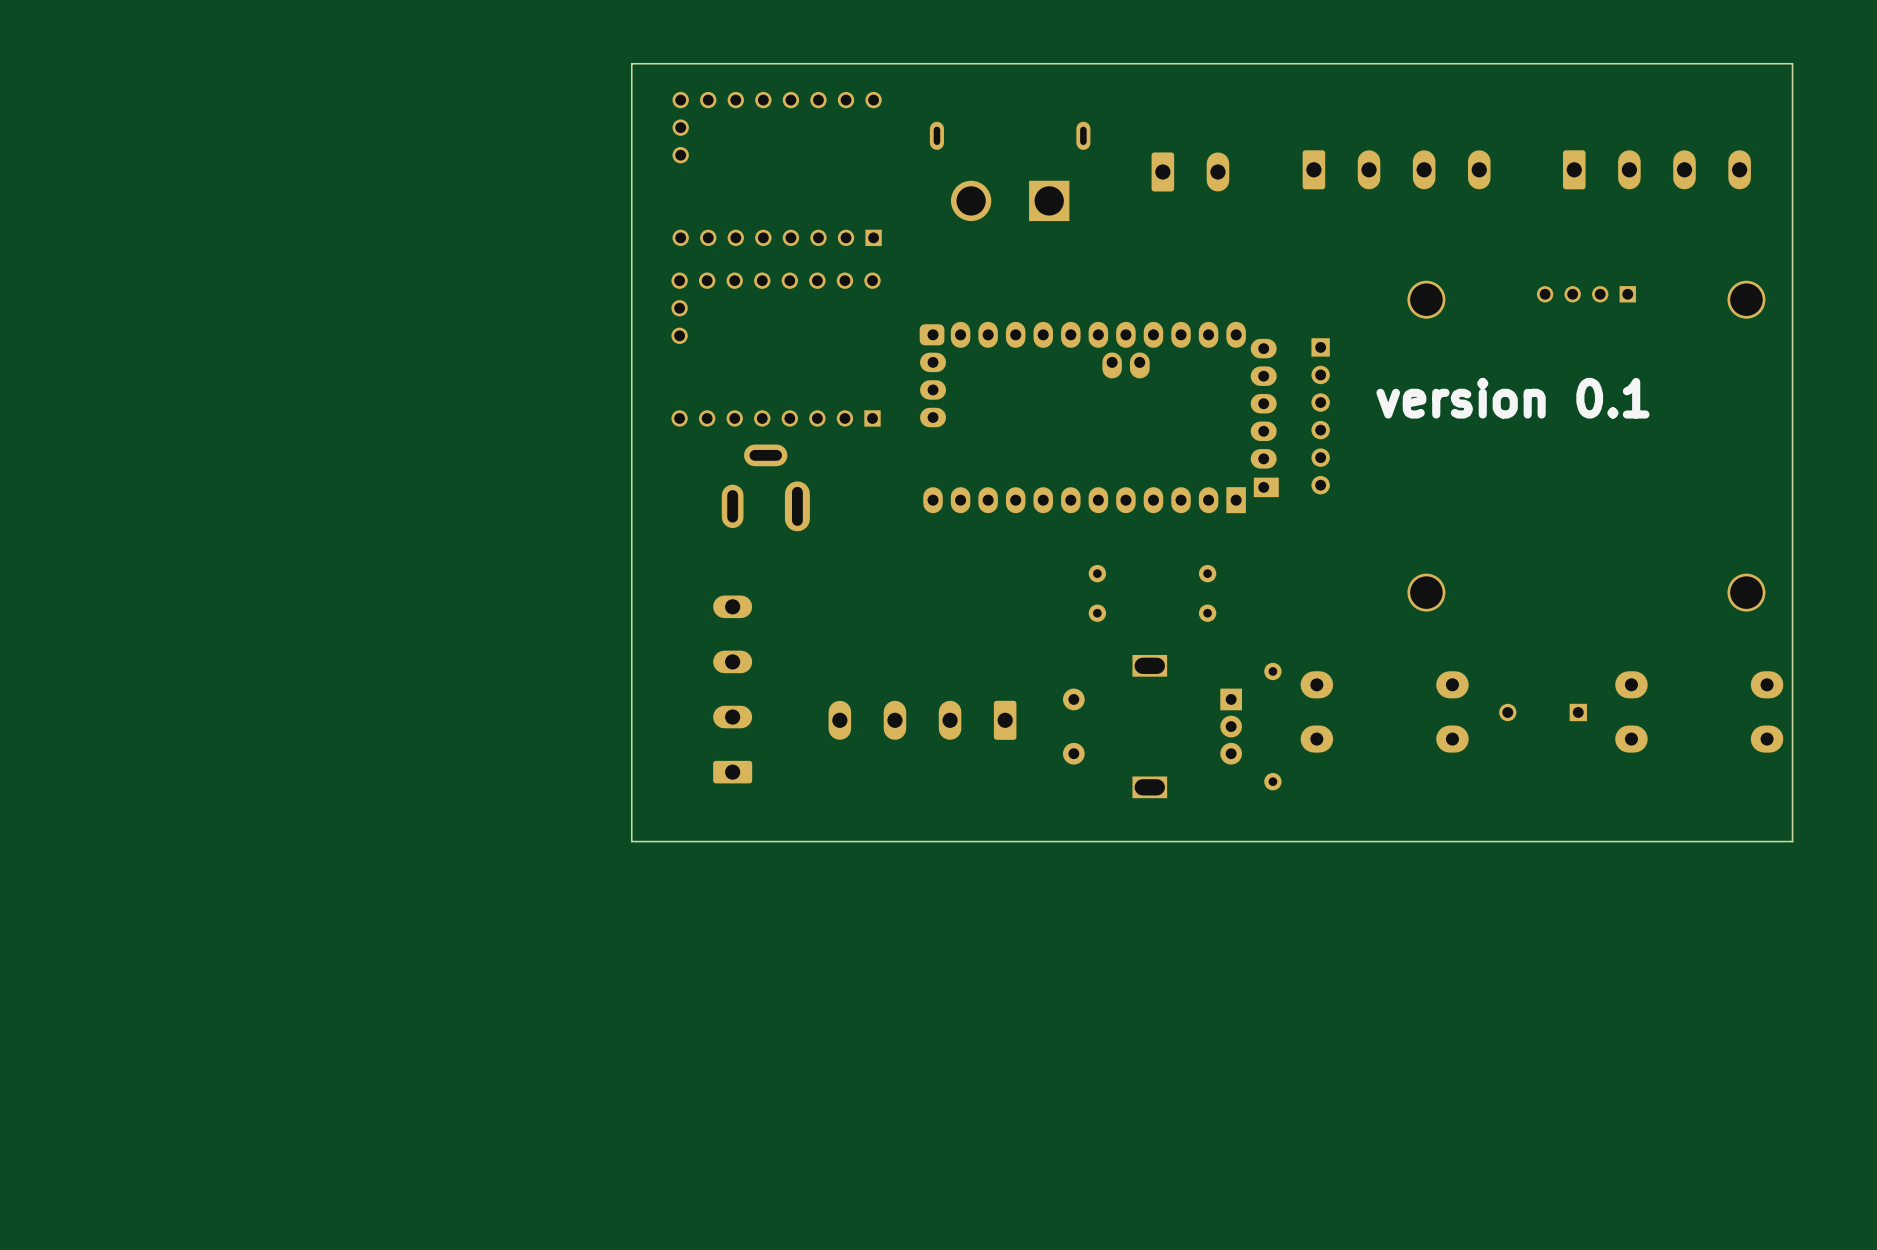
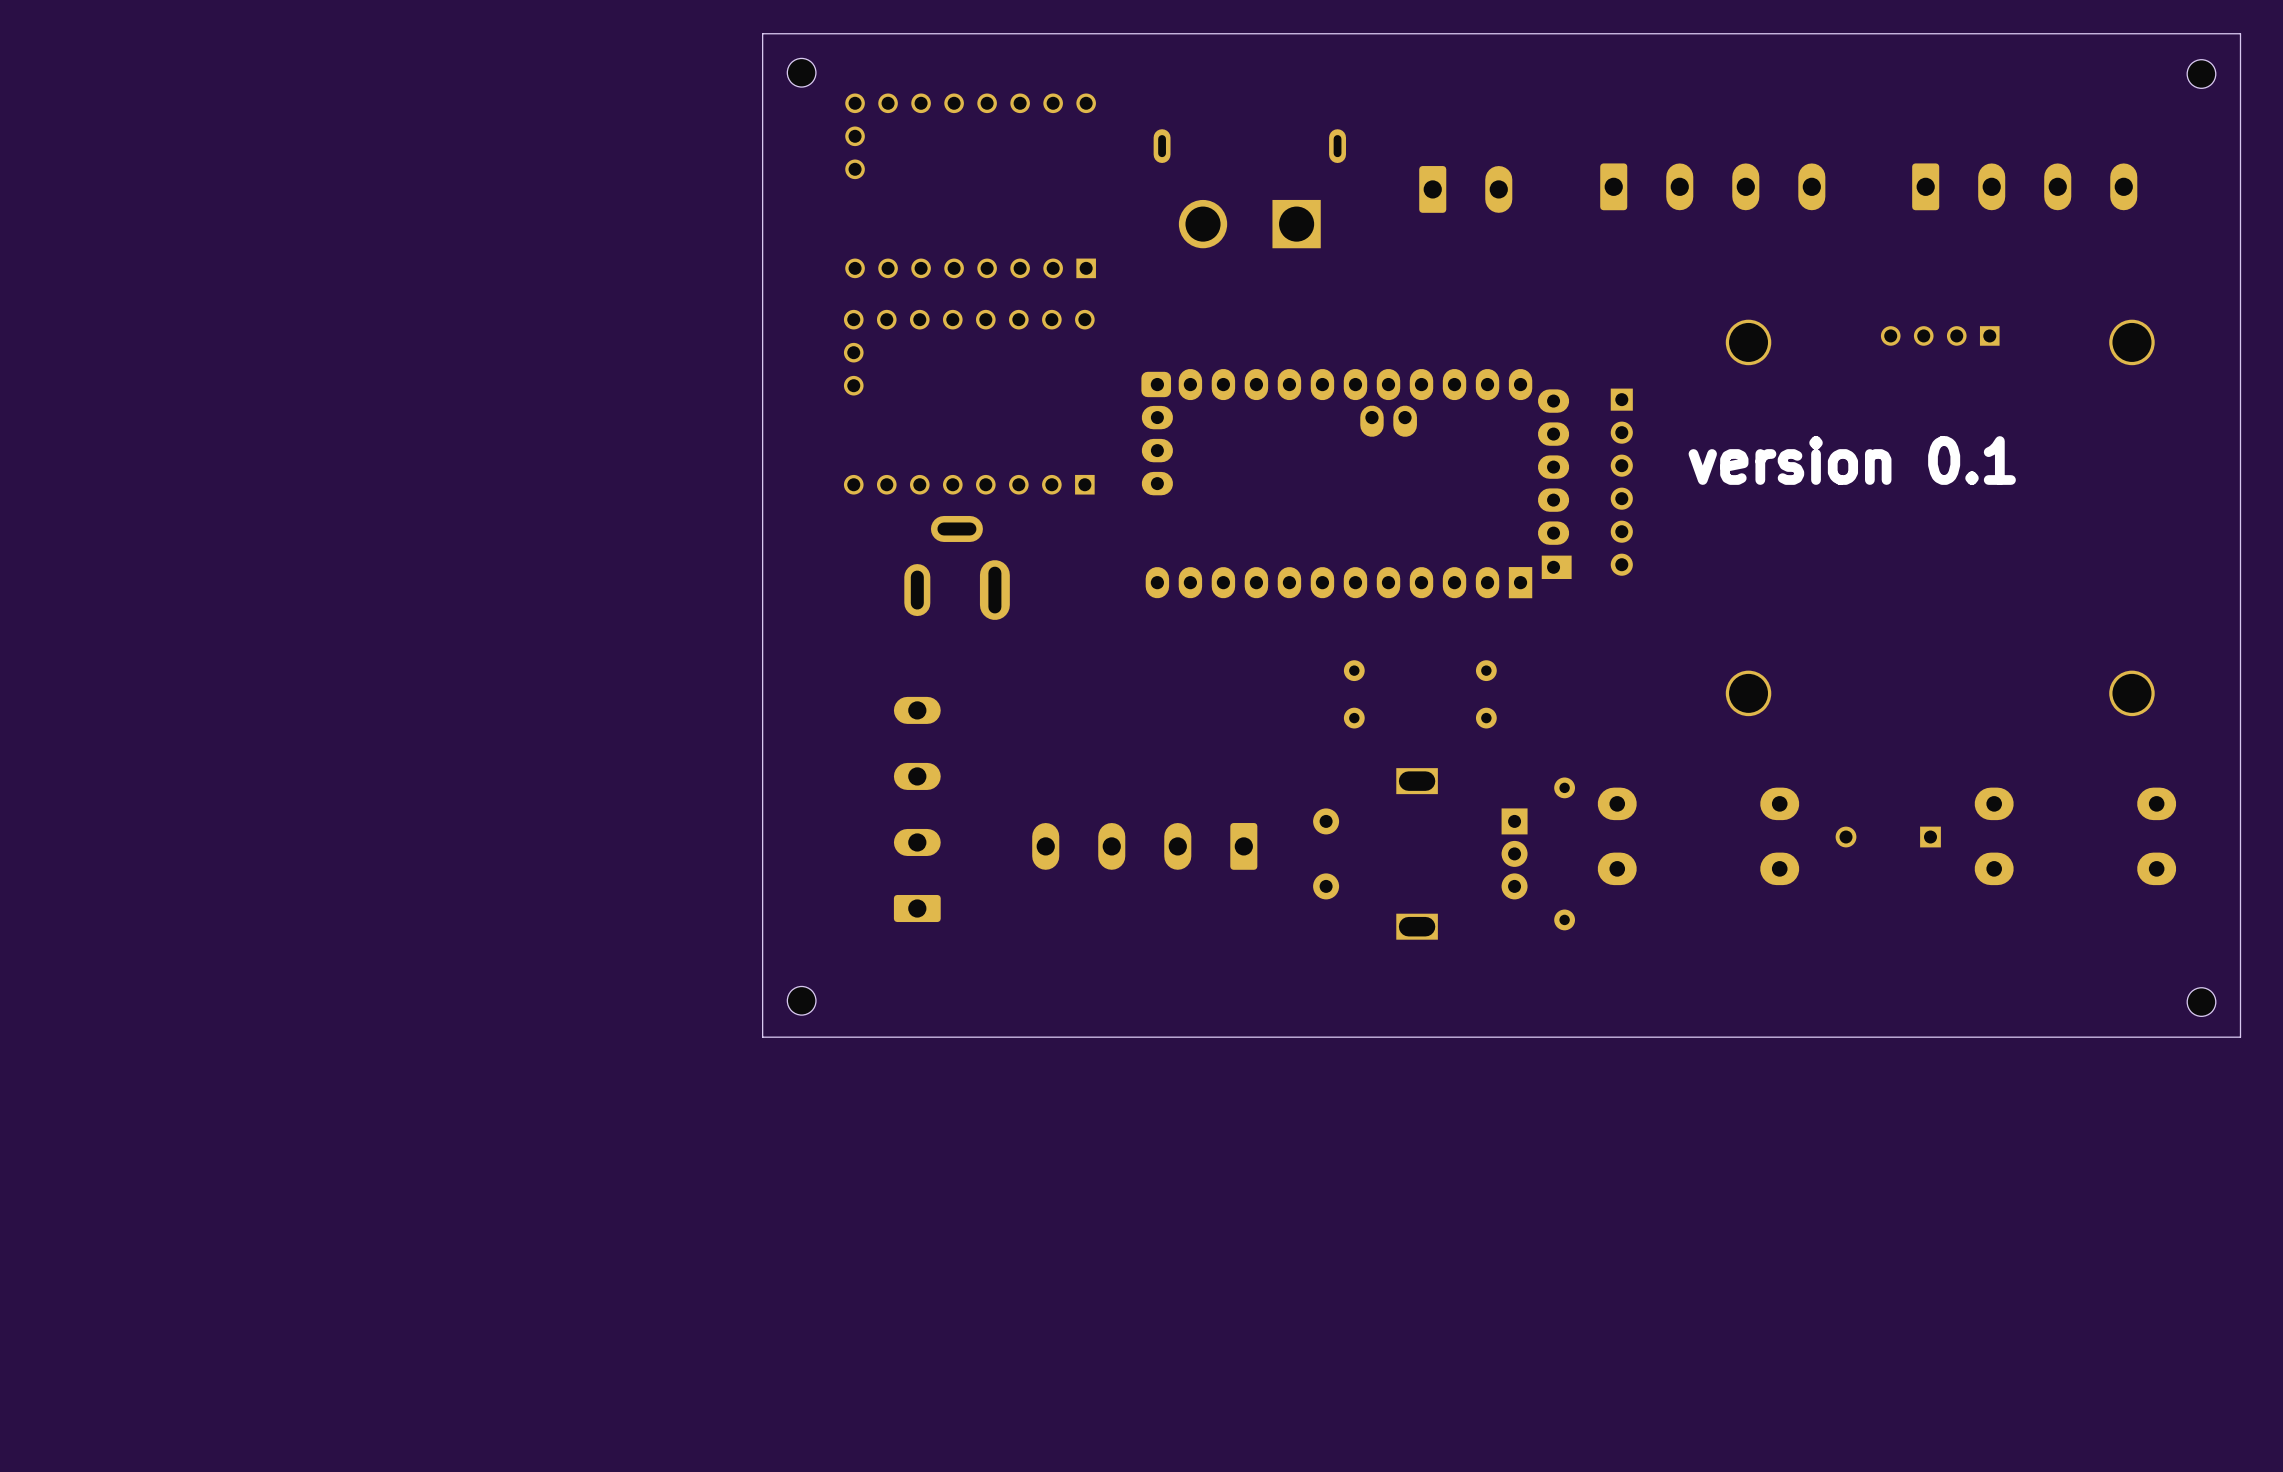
board edge: (1792, 63) (631, 63) (631, 841) (1792, 841) (1792, 63) -> (2240, 33) (2240, 1037) (762, 1037) (762, 33) (2240, 33)
part: none -> (801, 72)
part: none -> (2201, 74)
part: none -> (801, 1000)
part: none -> (2201, 1002)

